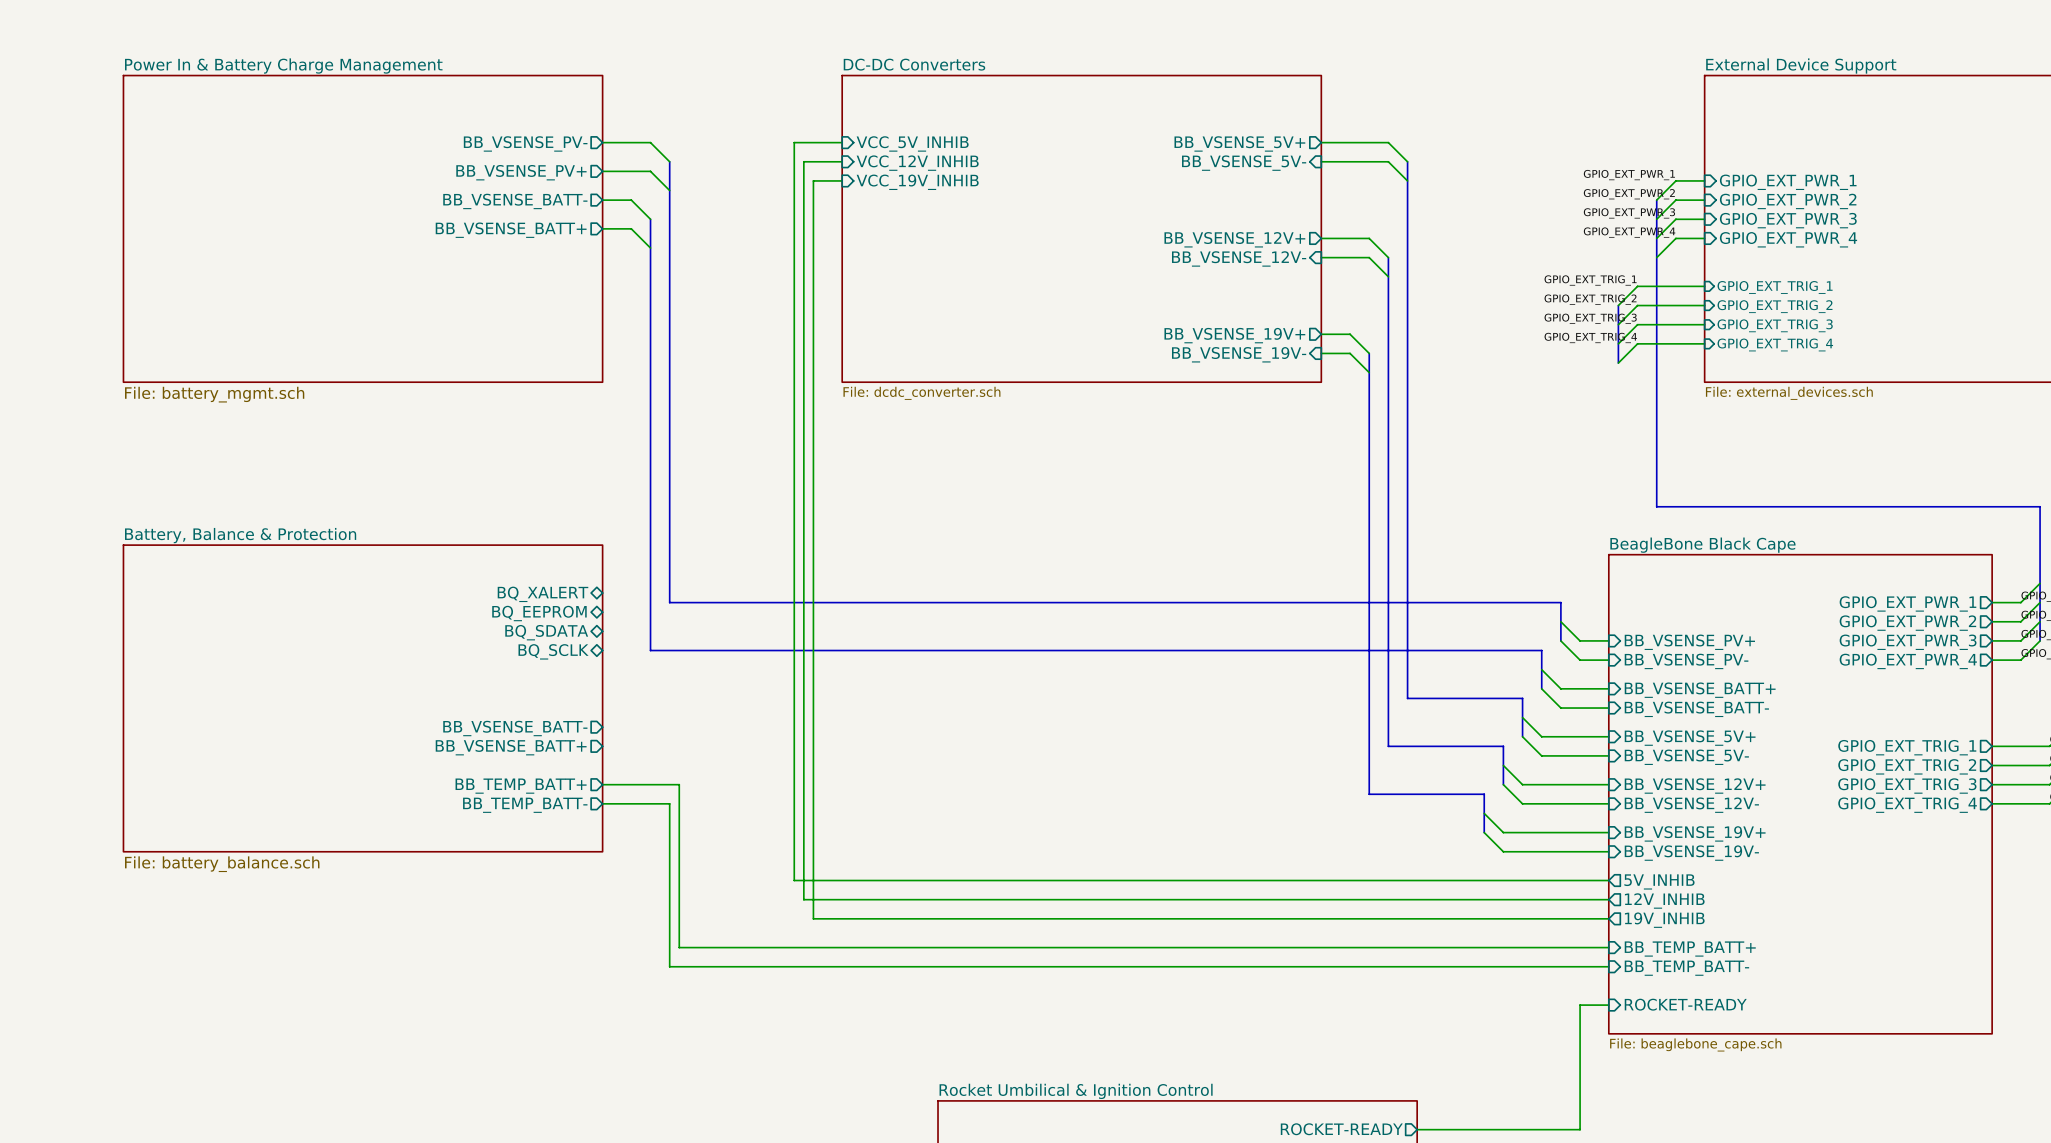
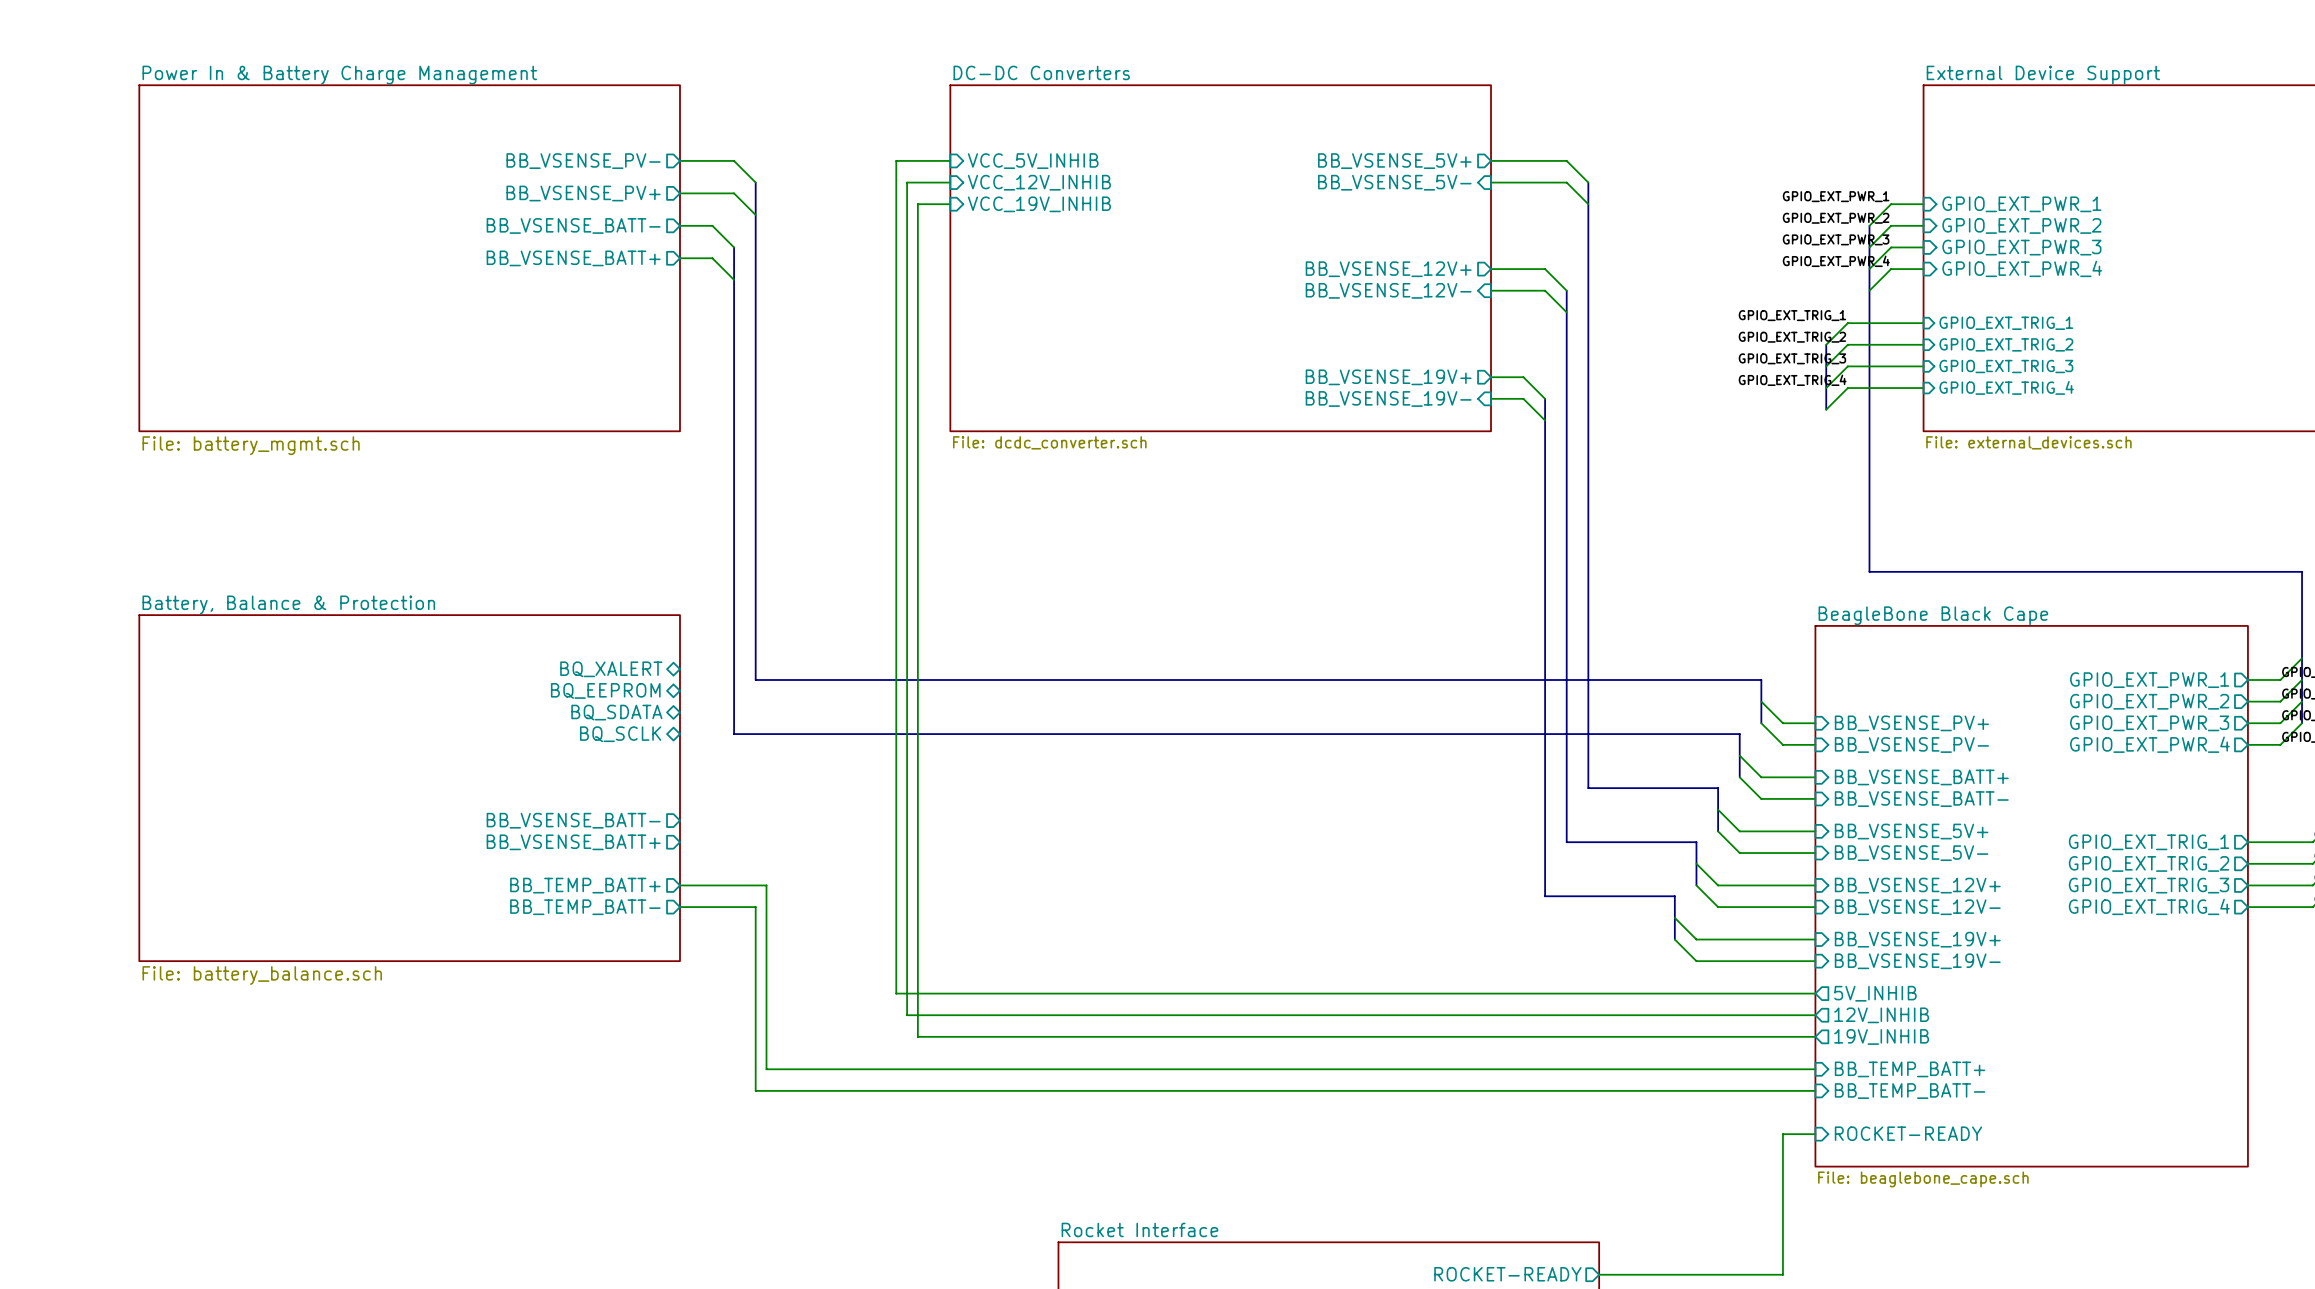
sheet Rocket Interface name: Rocket Umbilical & Ignition Control (1076, 1091) -> Rocket Interface (1139, 1229)

